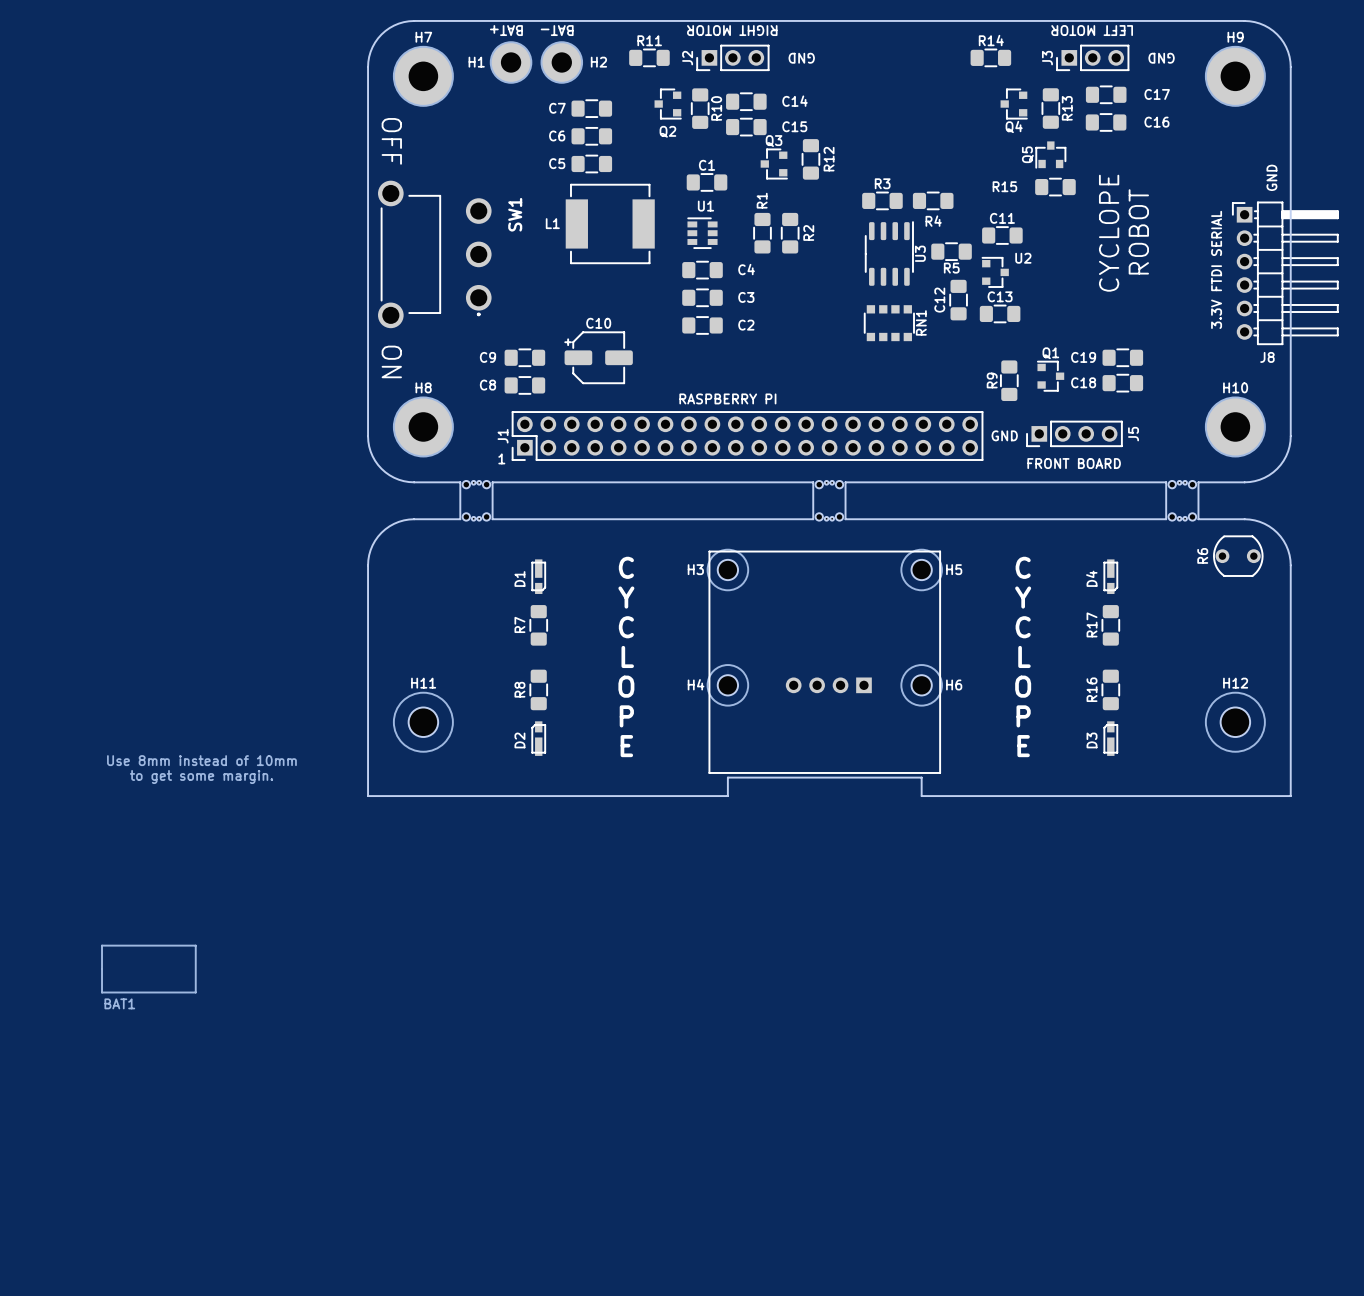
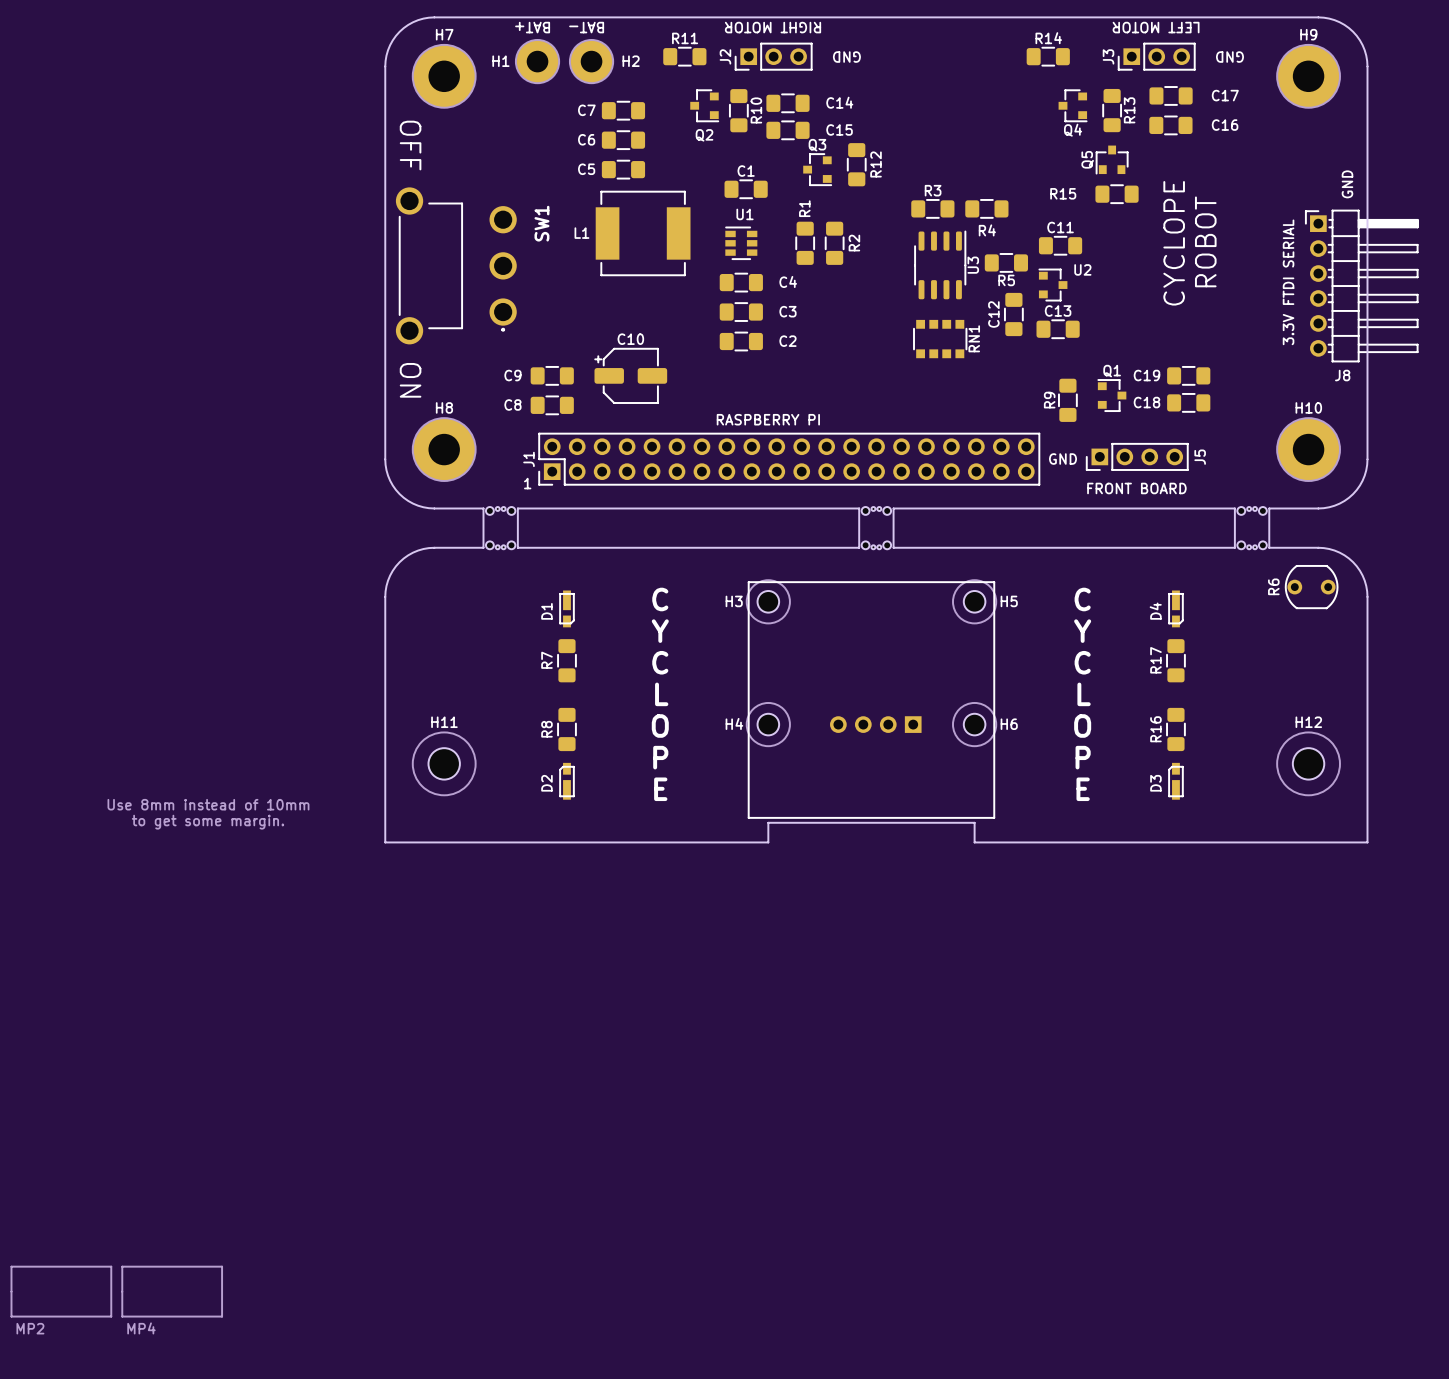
BAT1: (148, 969) -> none
MP2: none -> (61, 1291)
MP4: none -> (172, 1291)

